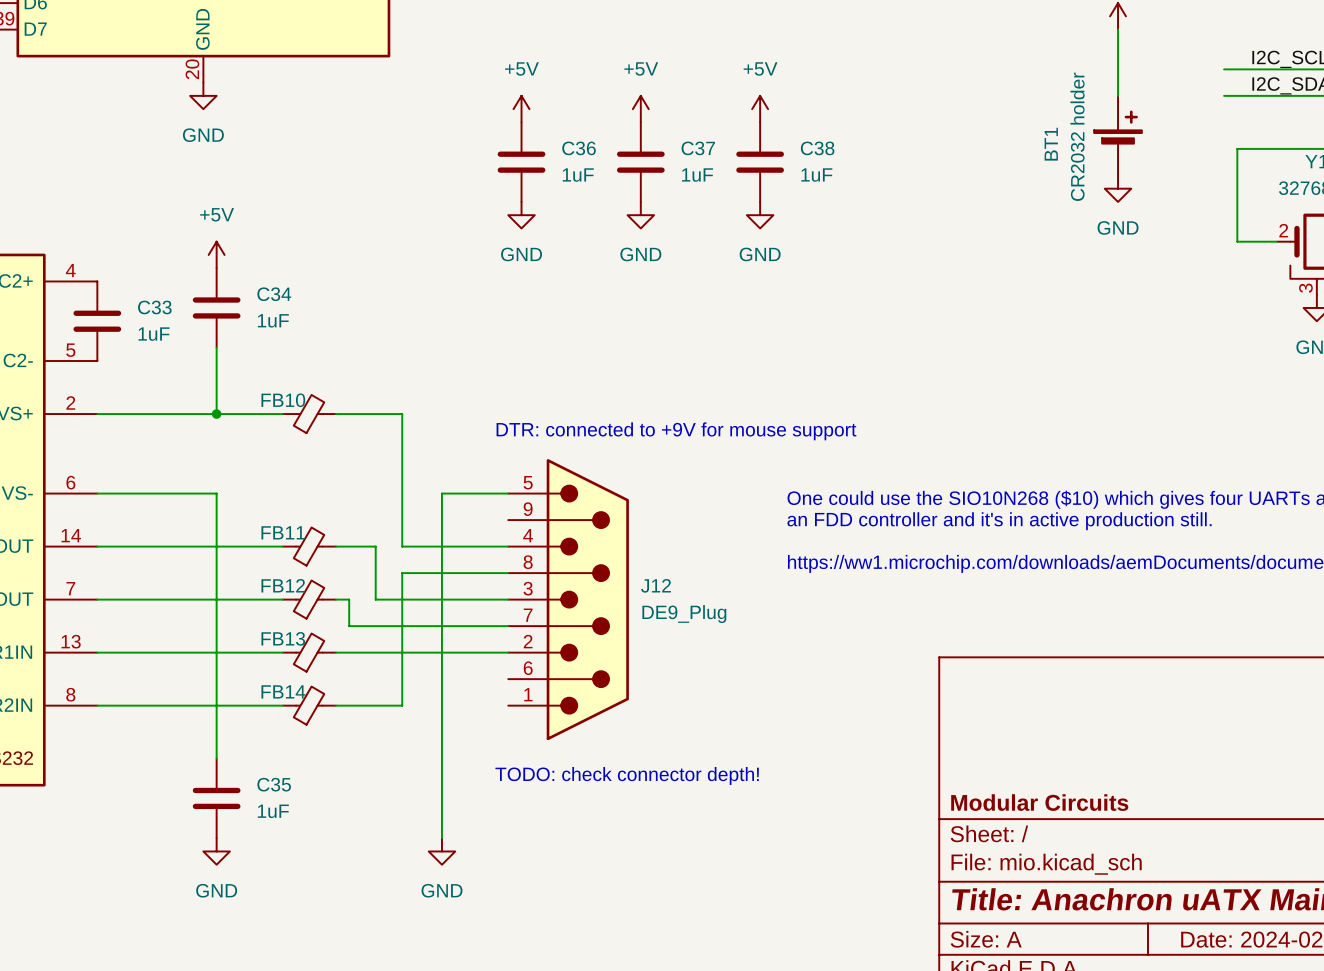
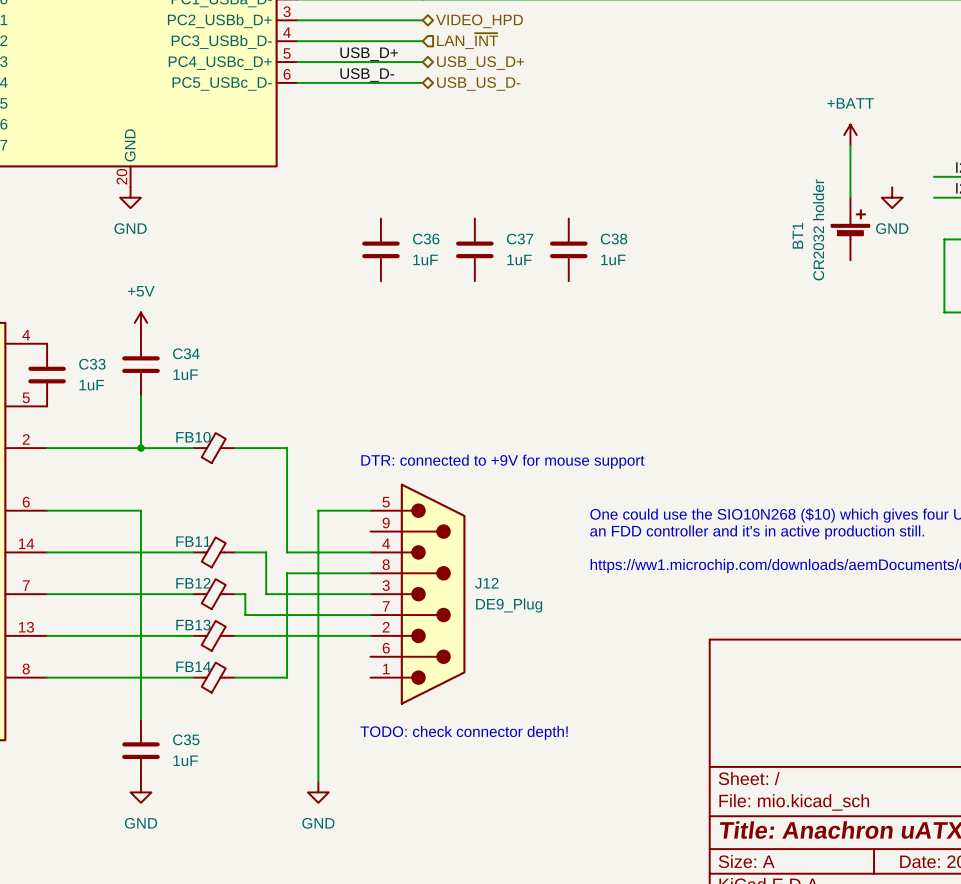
power symbol: +5V (521, 109) -> none
power symbol: +5V (640, 109) -> none
power symbol: +5V (760, 109) -> none
power symbol position: GND (1118, 188) -> GND (892, 197)
power symbol: GND (521, 215) -> none
power symbol: GND (640, 215) -> none
power symbol: GND (760, 215) -> none
title block: Modular Circuits (1039, 802) -> none

